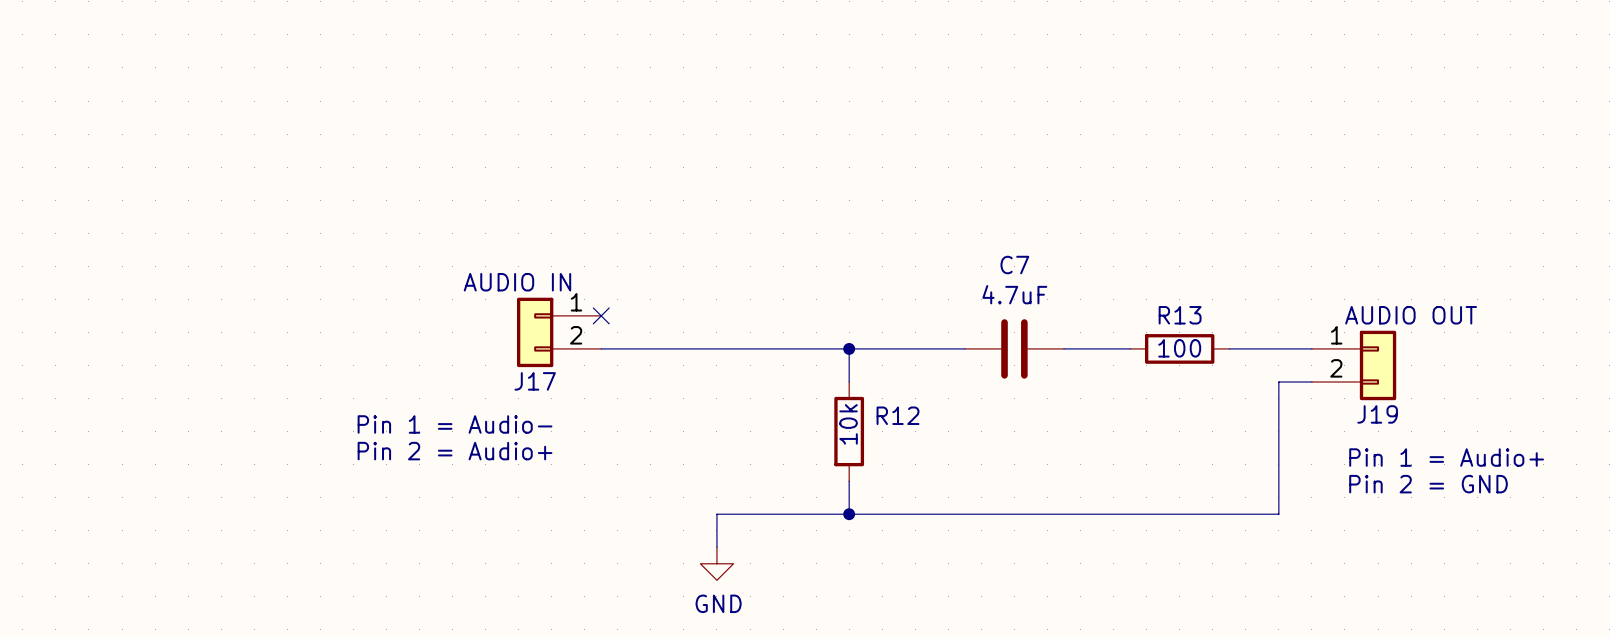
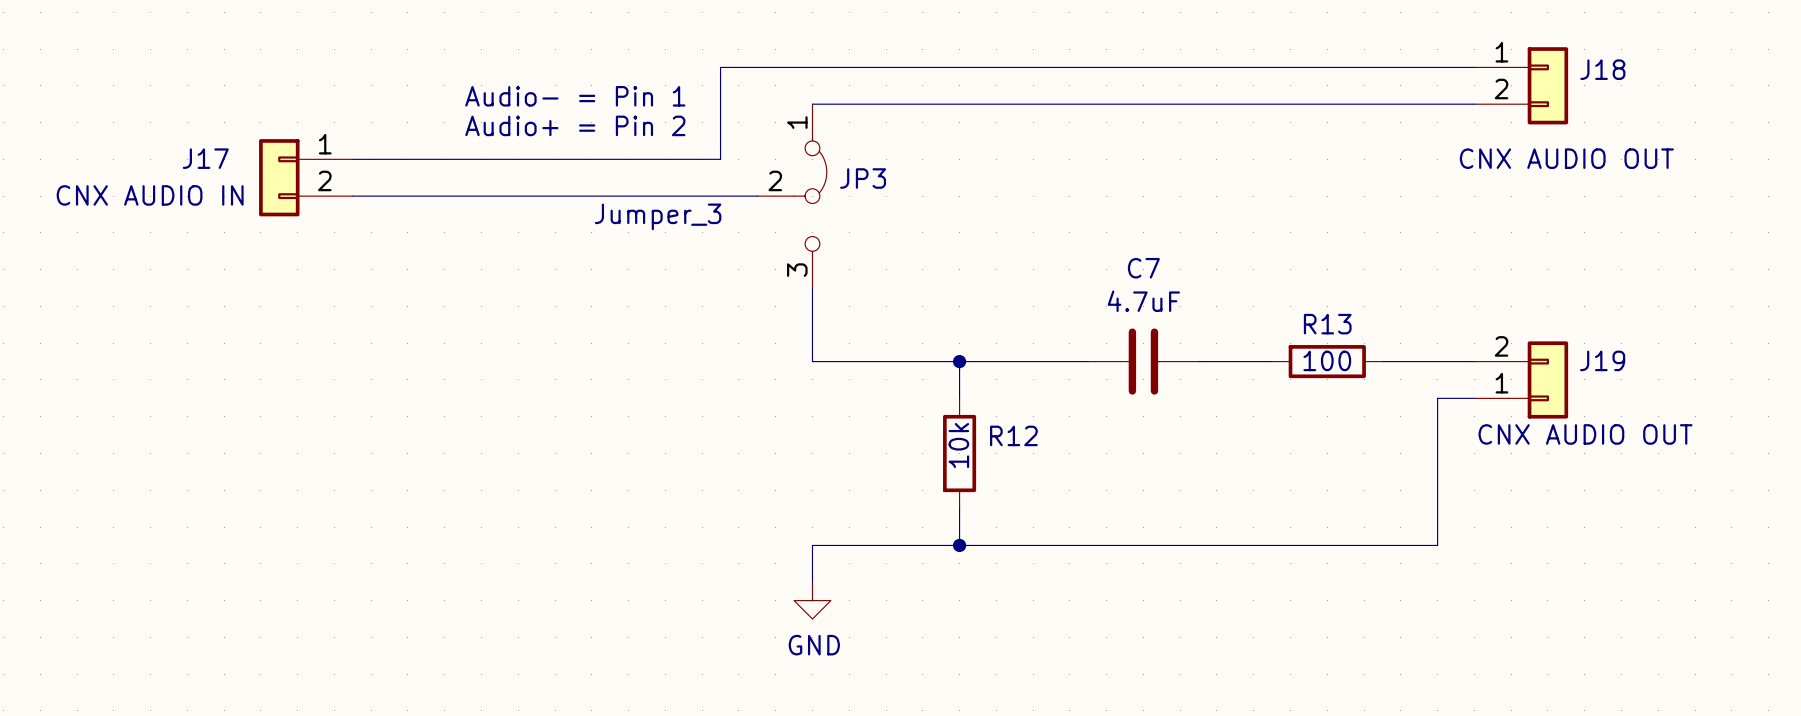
wire: none -> (1474, 67) (720, 67) (720, 159) (352, 159)
J18: none -> CNX AUDIO OUT (1521, 85)
text: none -> Audio- = Pin 1 (575, 96)
wire: none -> (812, 104) (1474, 104)
text: none -> Audio+ = Pin 2 (575, 125)
wire: none -> (352, 196) (757, 196)
JP3: none -> Jumper_3 (792, 196)
J17 value: AUDIO IN (517, 282) -> CNX AUDIO IN (150, 195)
no-connect mark: (601, 315) -> none
J19 value: AUDIO OUT (1411, 315) -> CNX AUDIO OUT (1585, 434)
J17 position: (559, 332) -> (305, 177)
wire: (601, 348) (716, 348) -> (812, 288) (812, 361)
J19 flip: as is (1378, 365) -> up-down (1547, 379)
J17 name position: J17 (535, 381) -> J17 (205, 158)
J19 name position: J19 (1377, 414) -> J19 (1602, 360)
text: Pin 1 = Audio- (455, 424) -> none
text: Pin 2 = Audio+ (455, 451) -> none
text: Pin 1 = Audio+ (1446, 457) -> none
text: Pin 2 = GND (1428, 484) -> none

